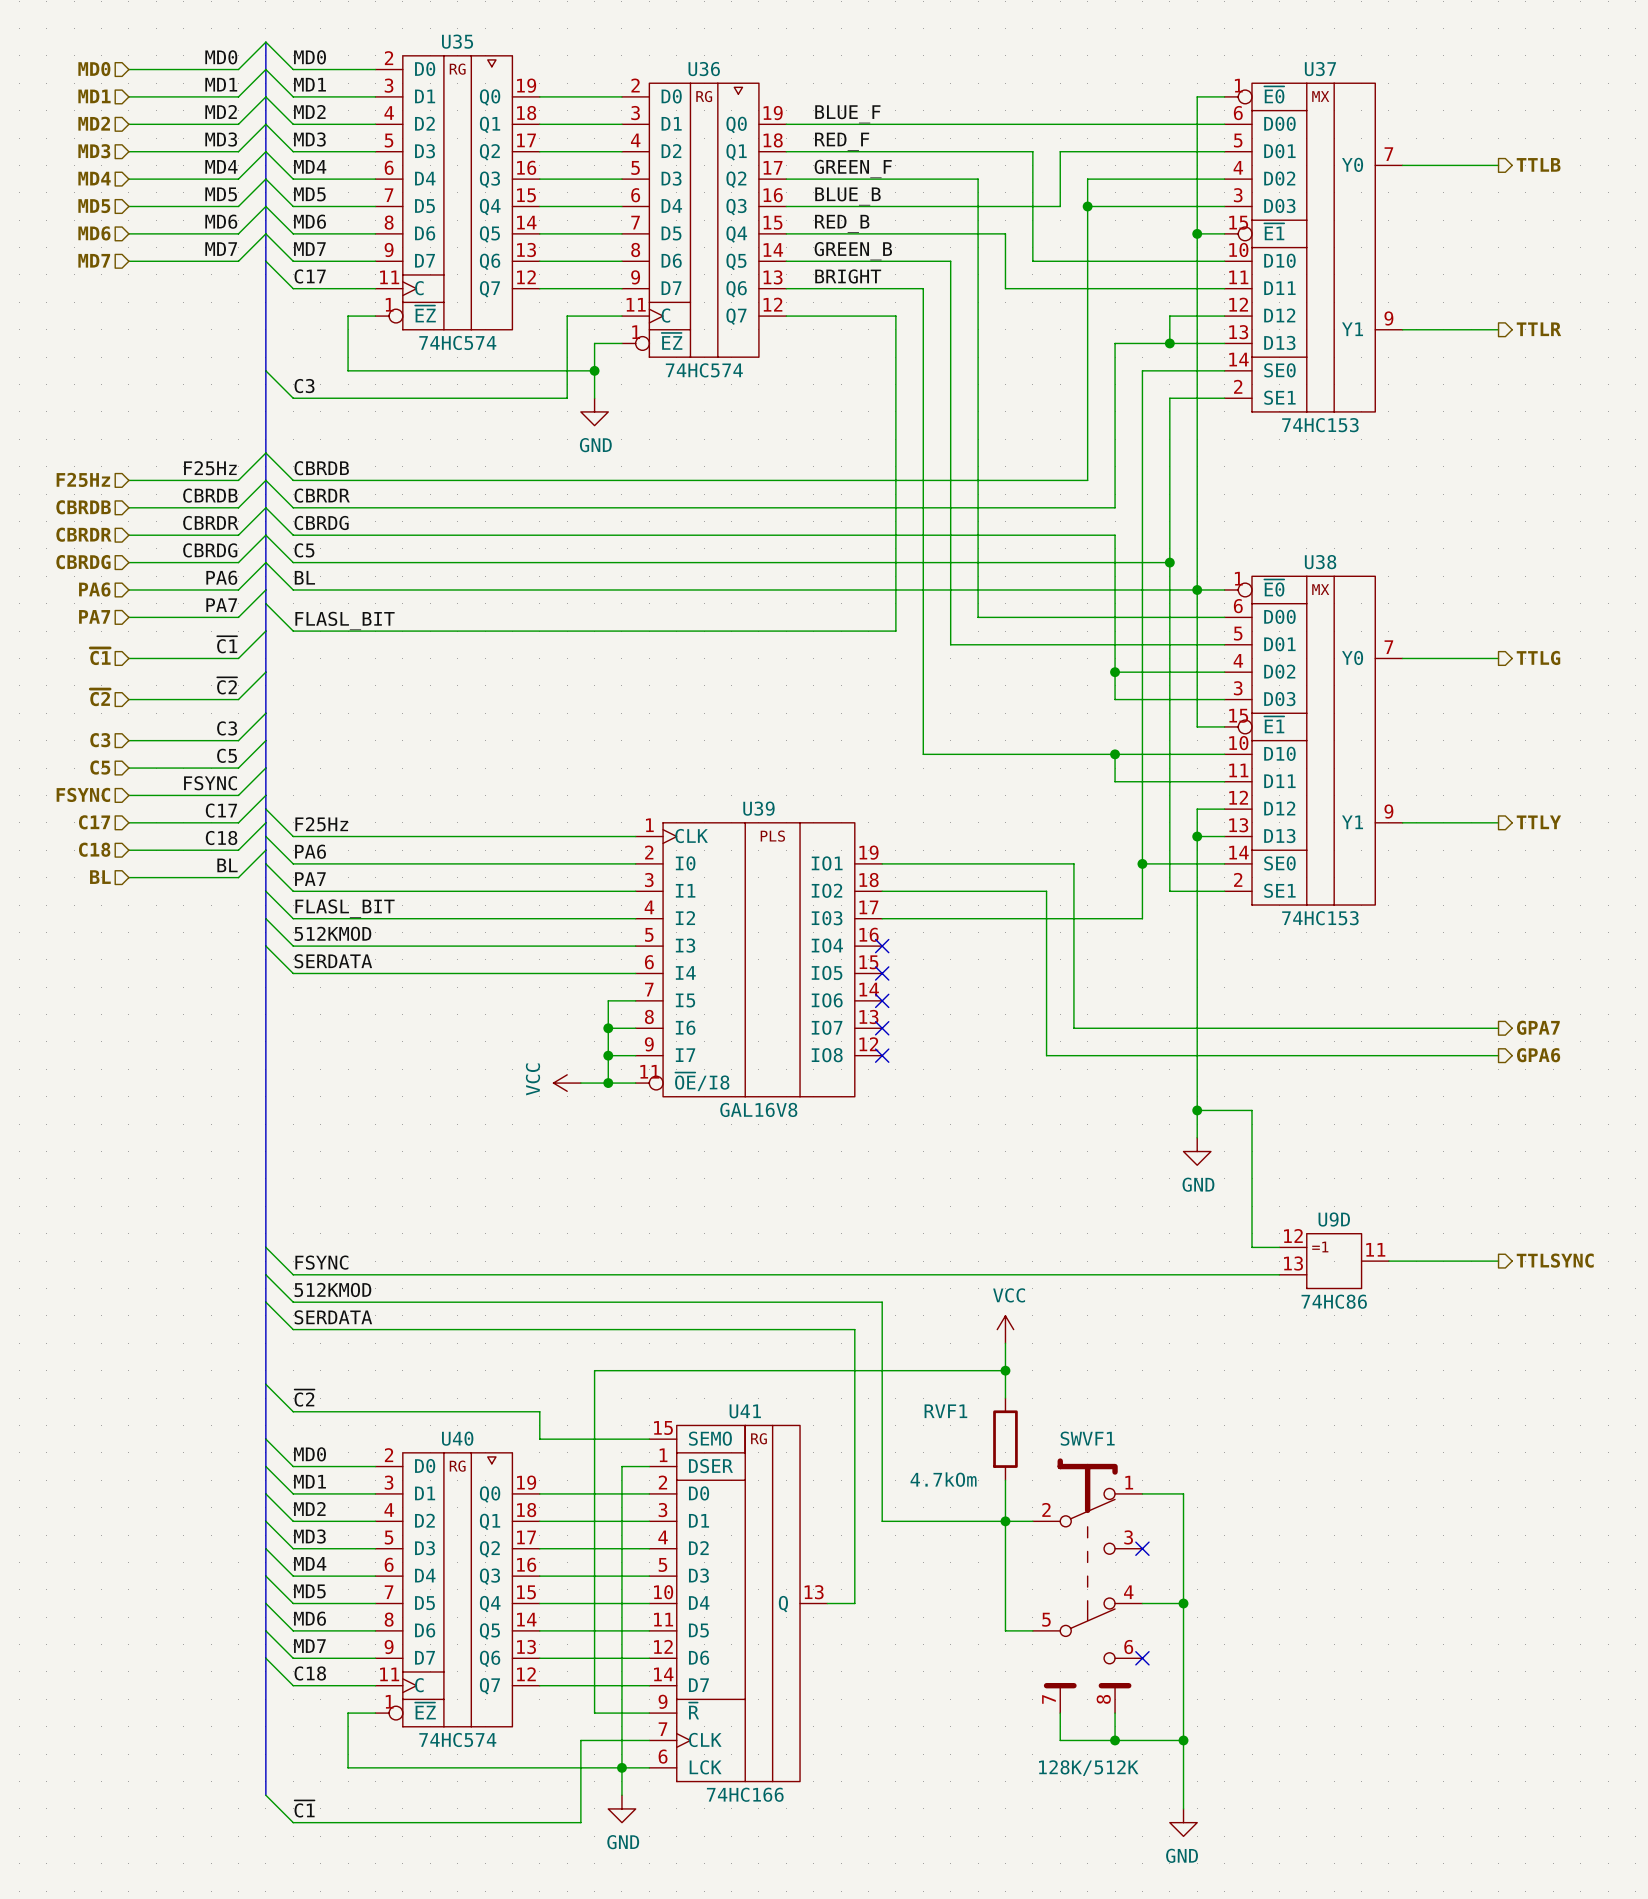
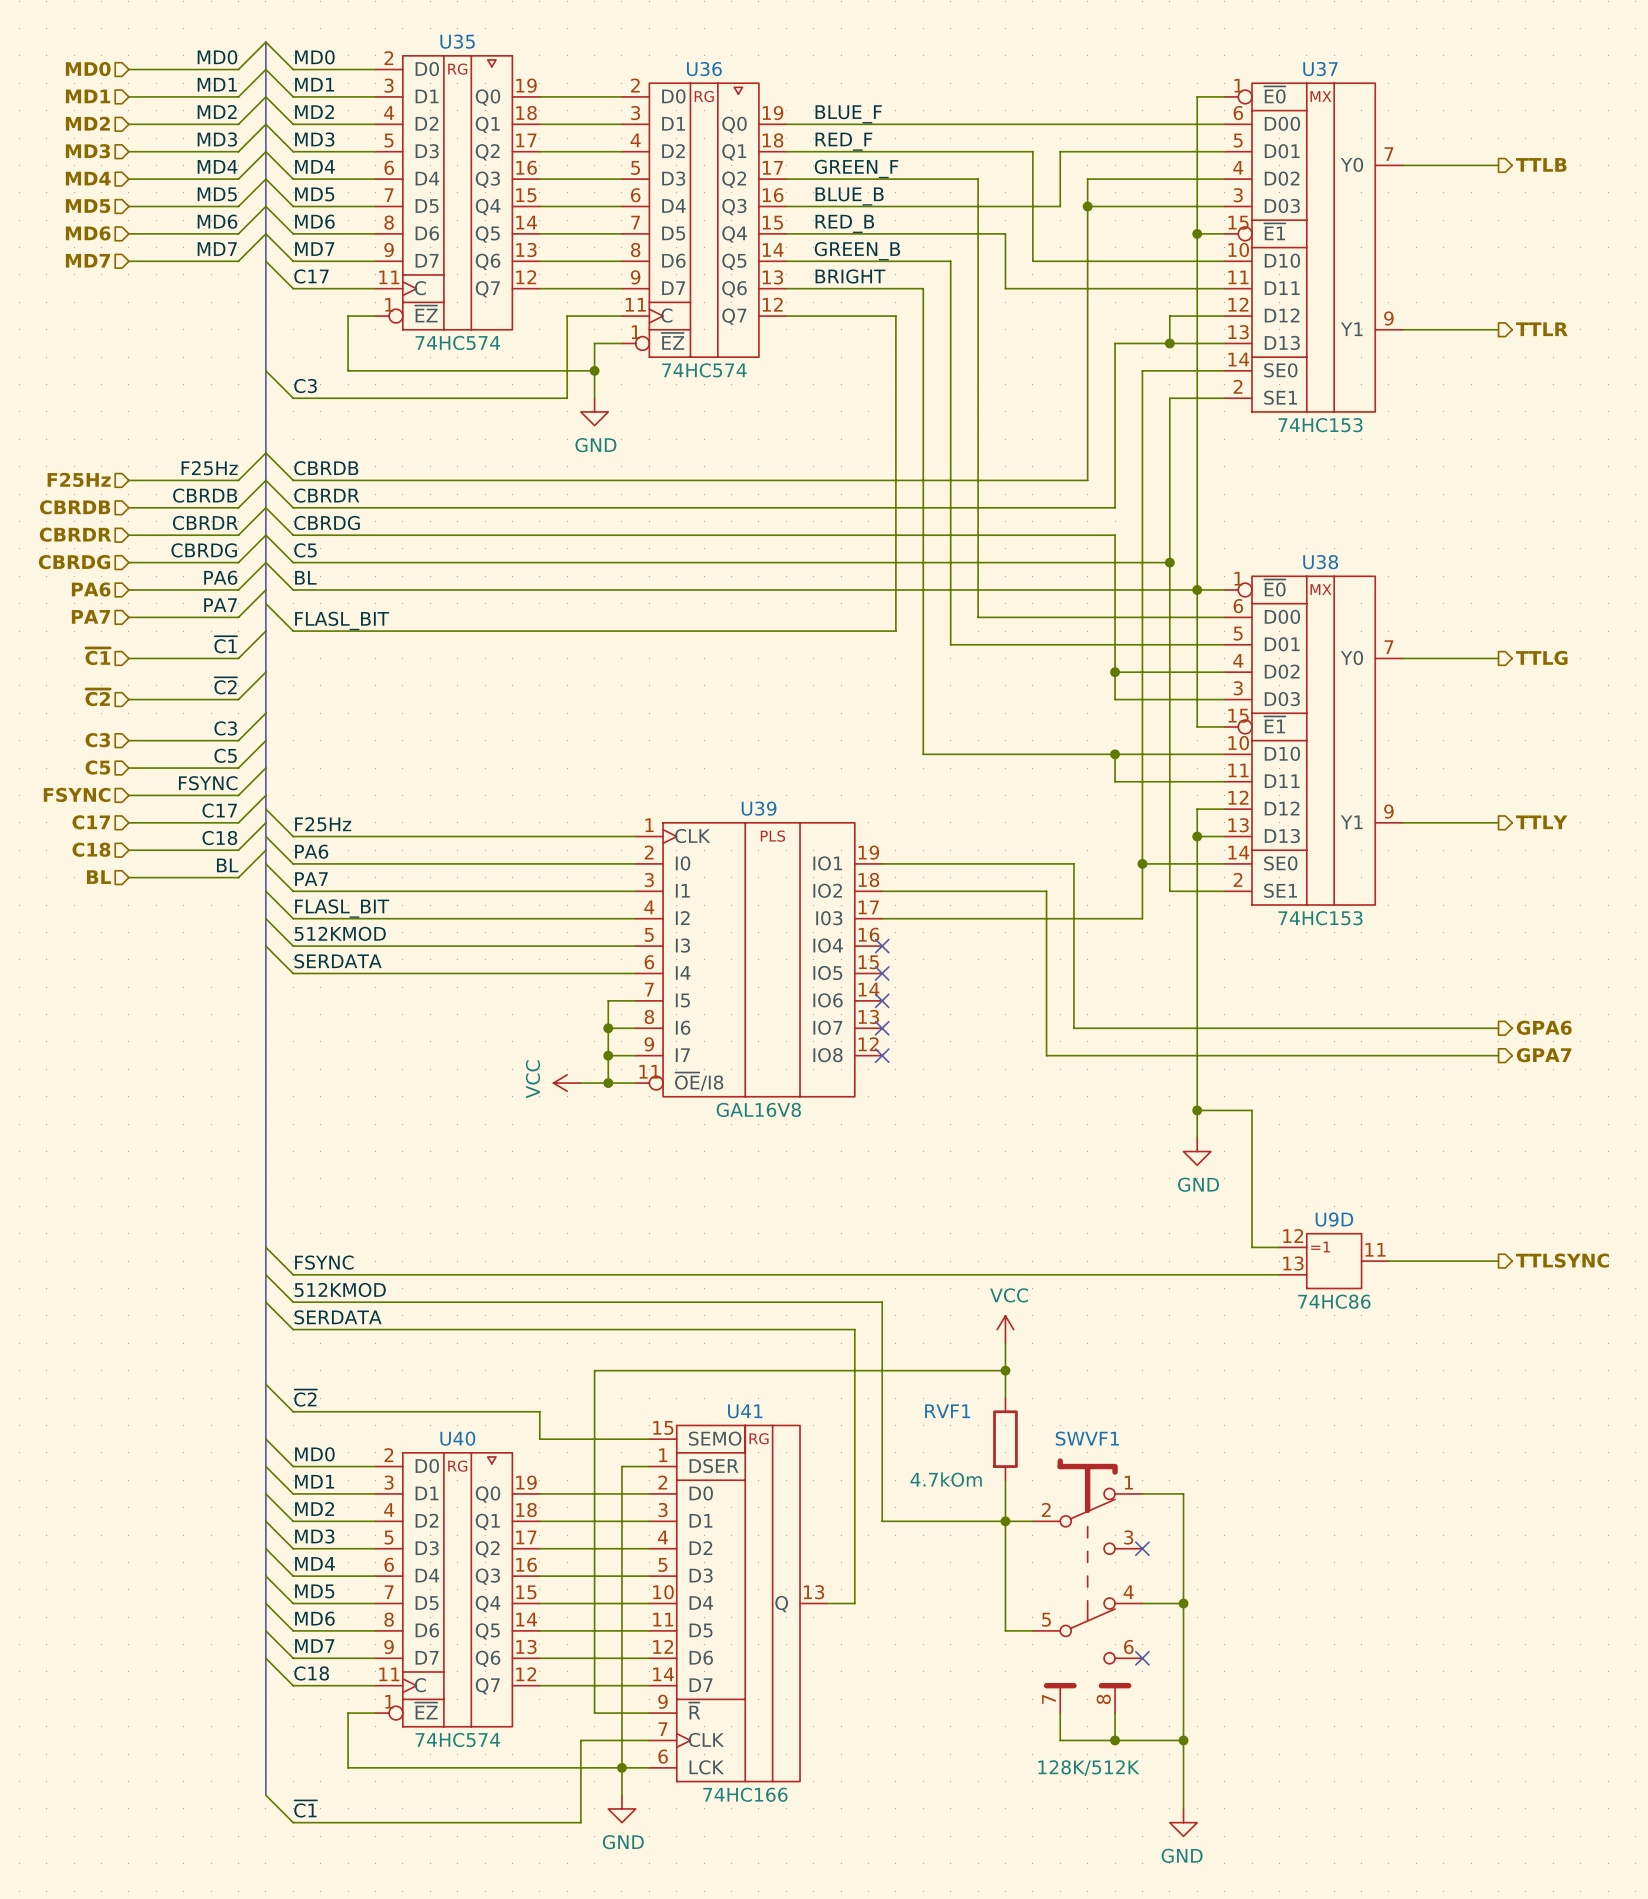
hierarchical label: GPA7 (1538, 1027) -> GPA6 (1544, 1027)
hierarchical label: GPA6 (1538, 1055) -> GPA7 (1544, 1055)

